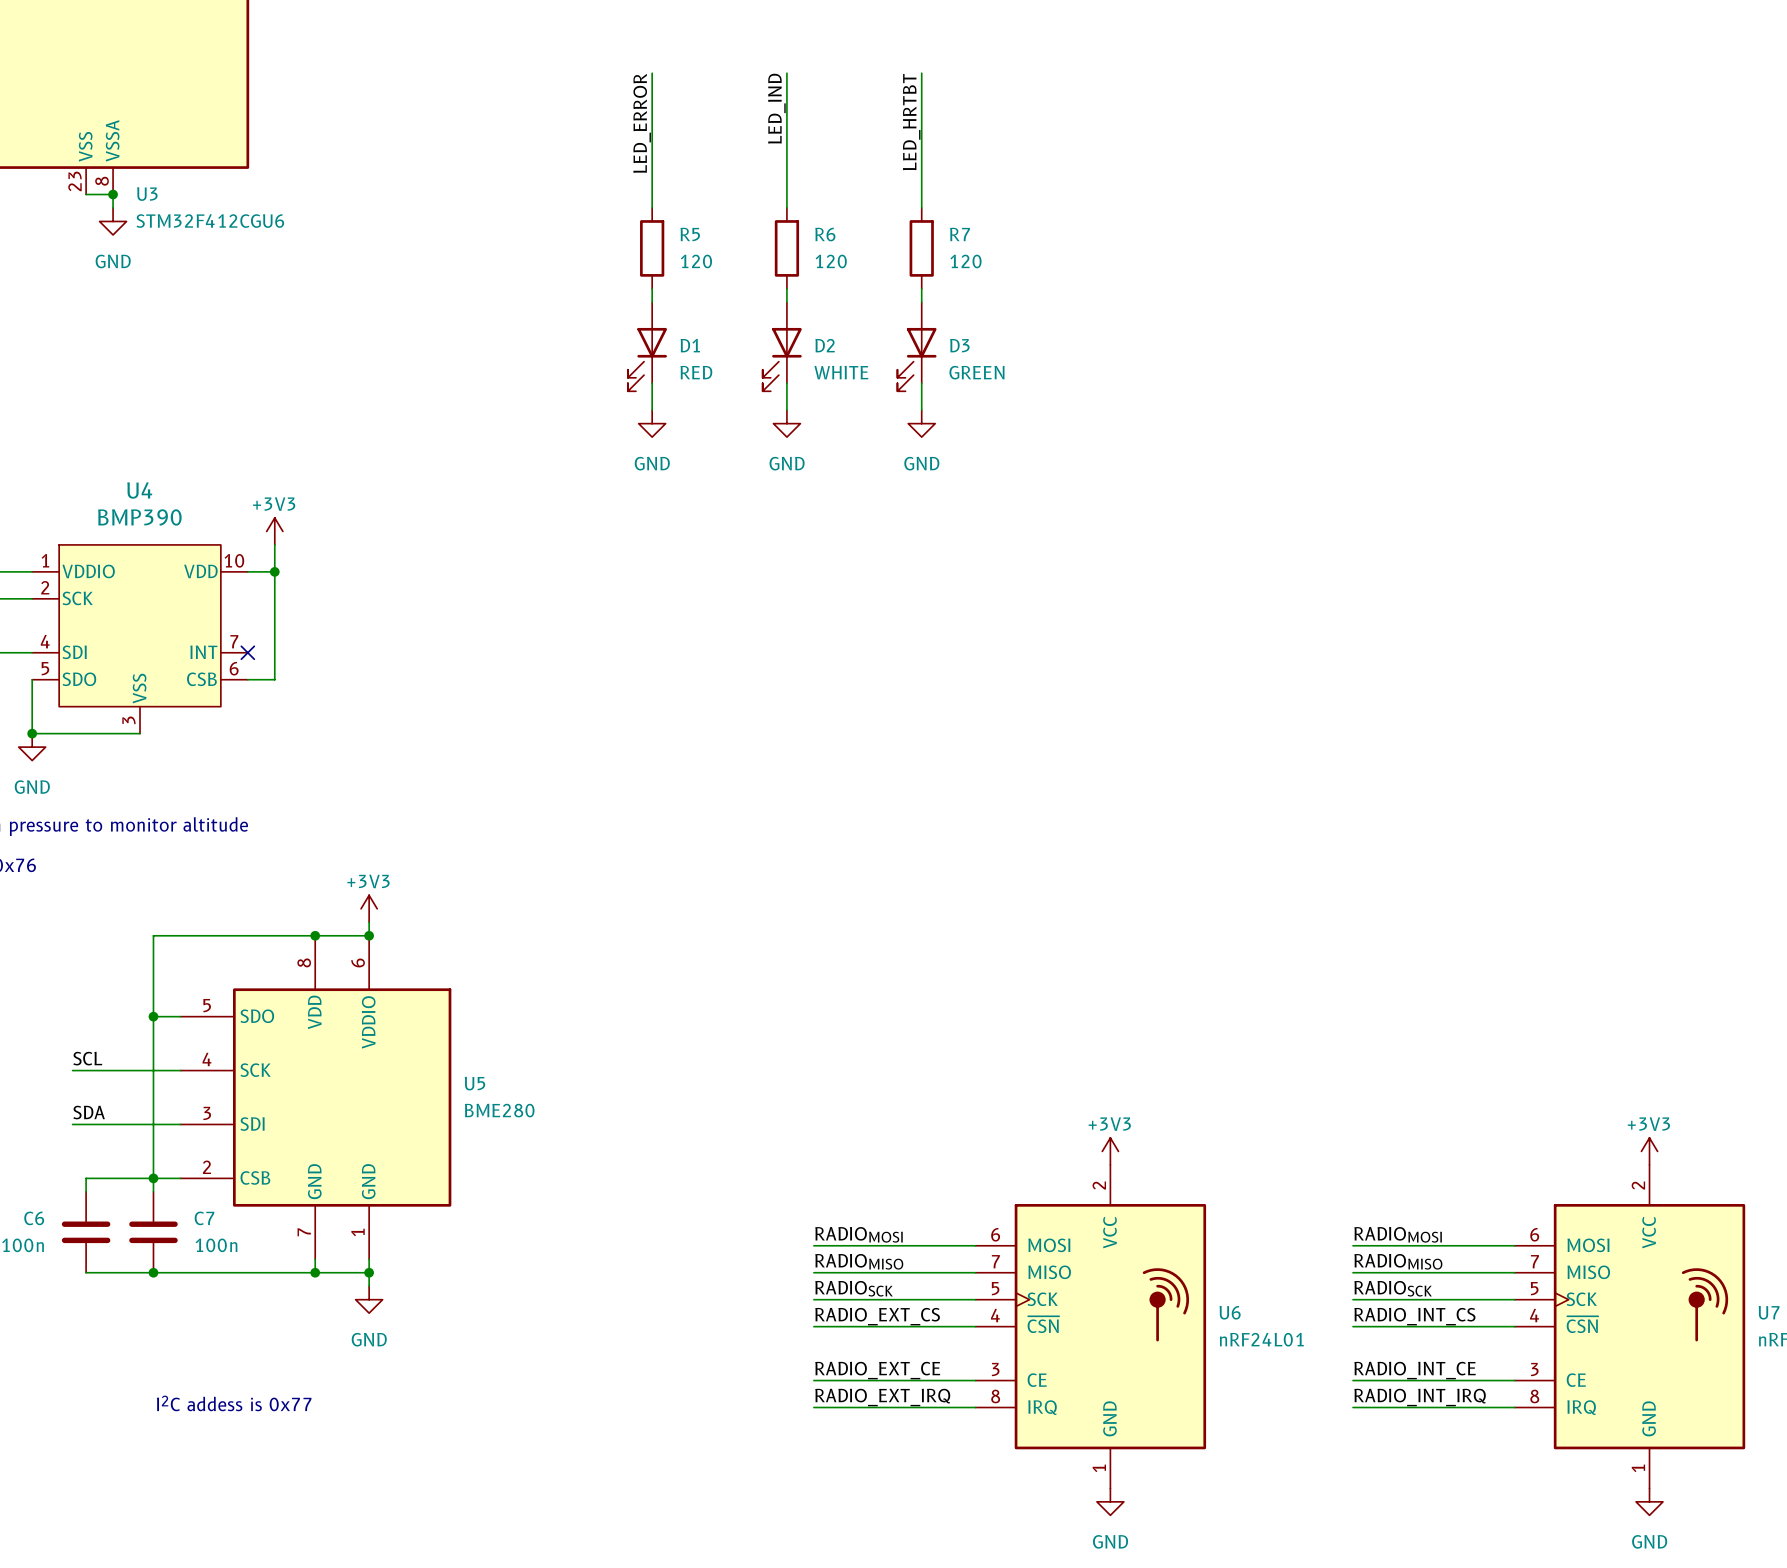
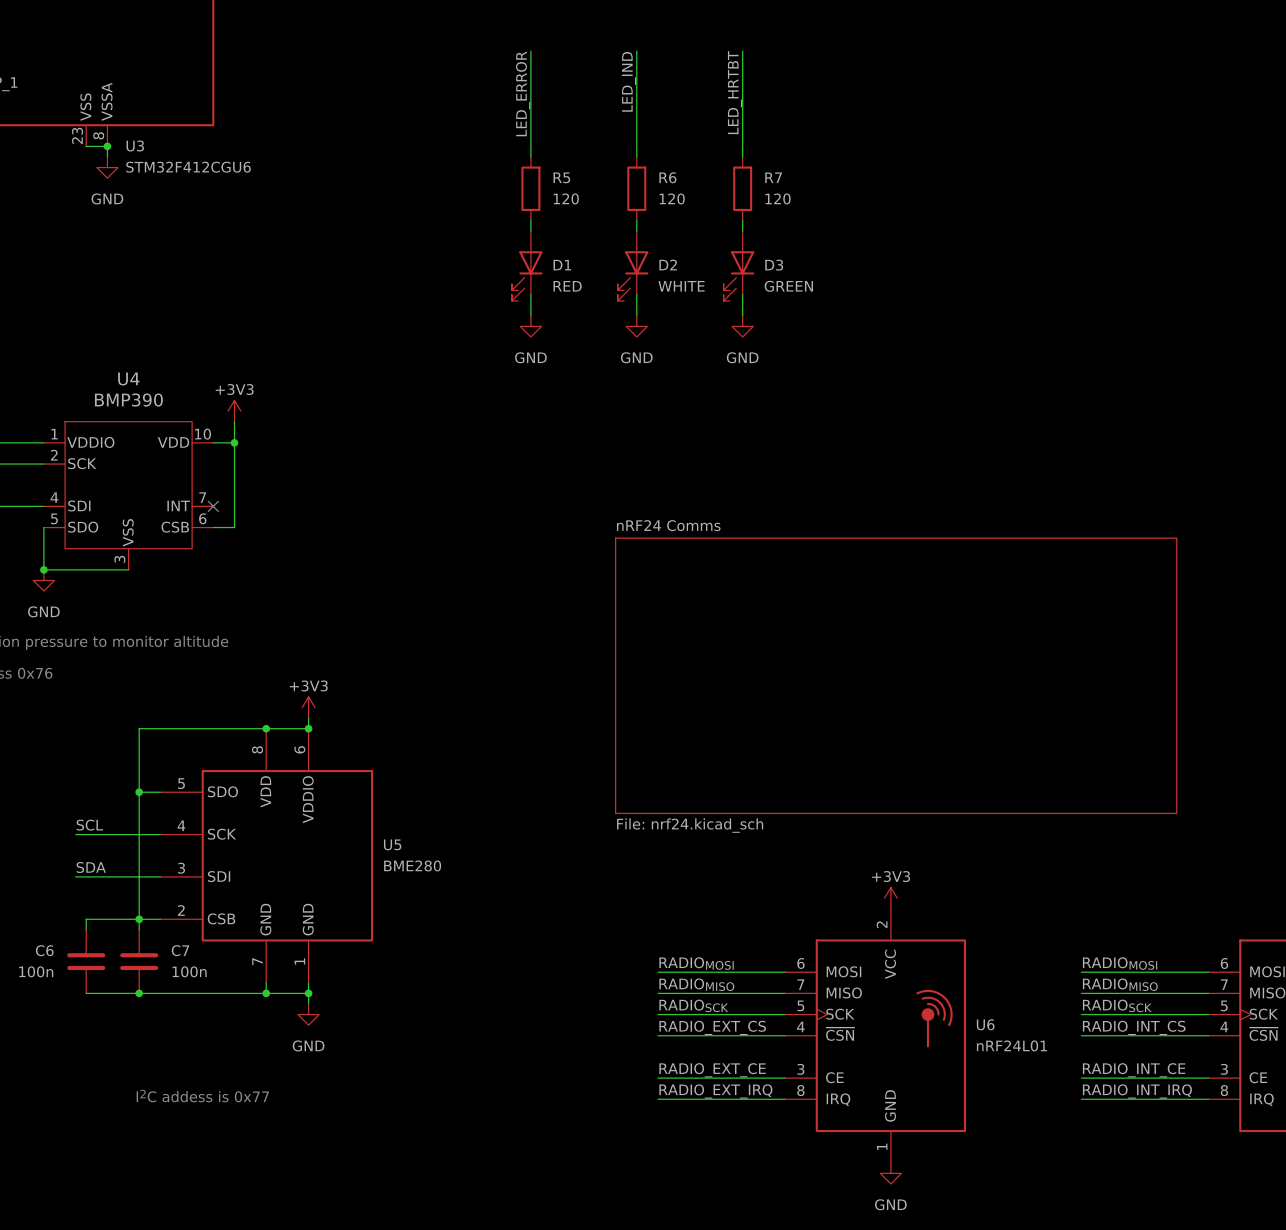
sheet nRF24 Comms: none -> File: nrf24.kicad_sch (896, 675)

